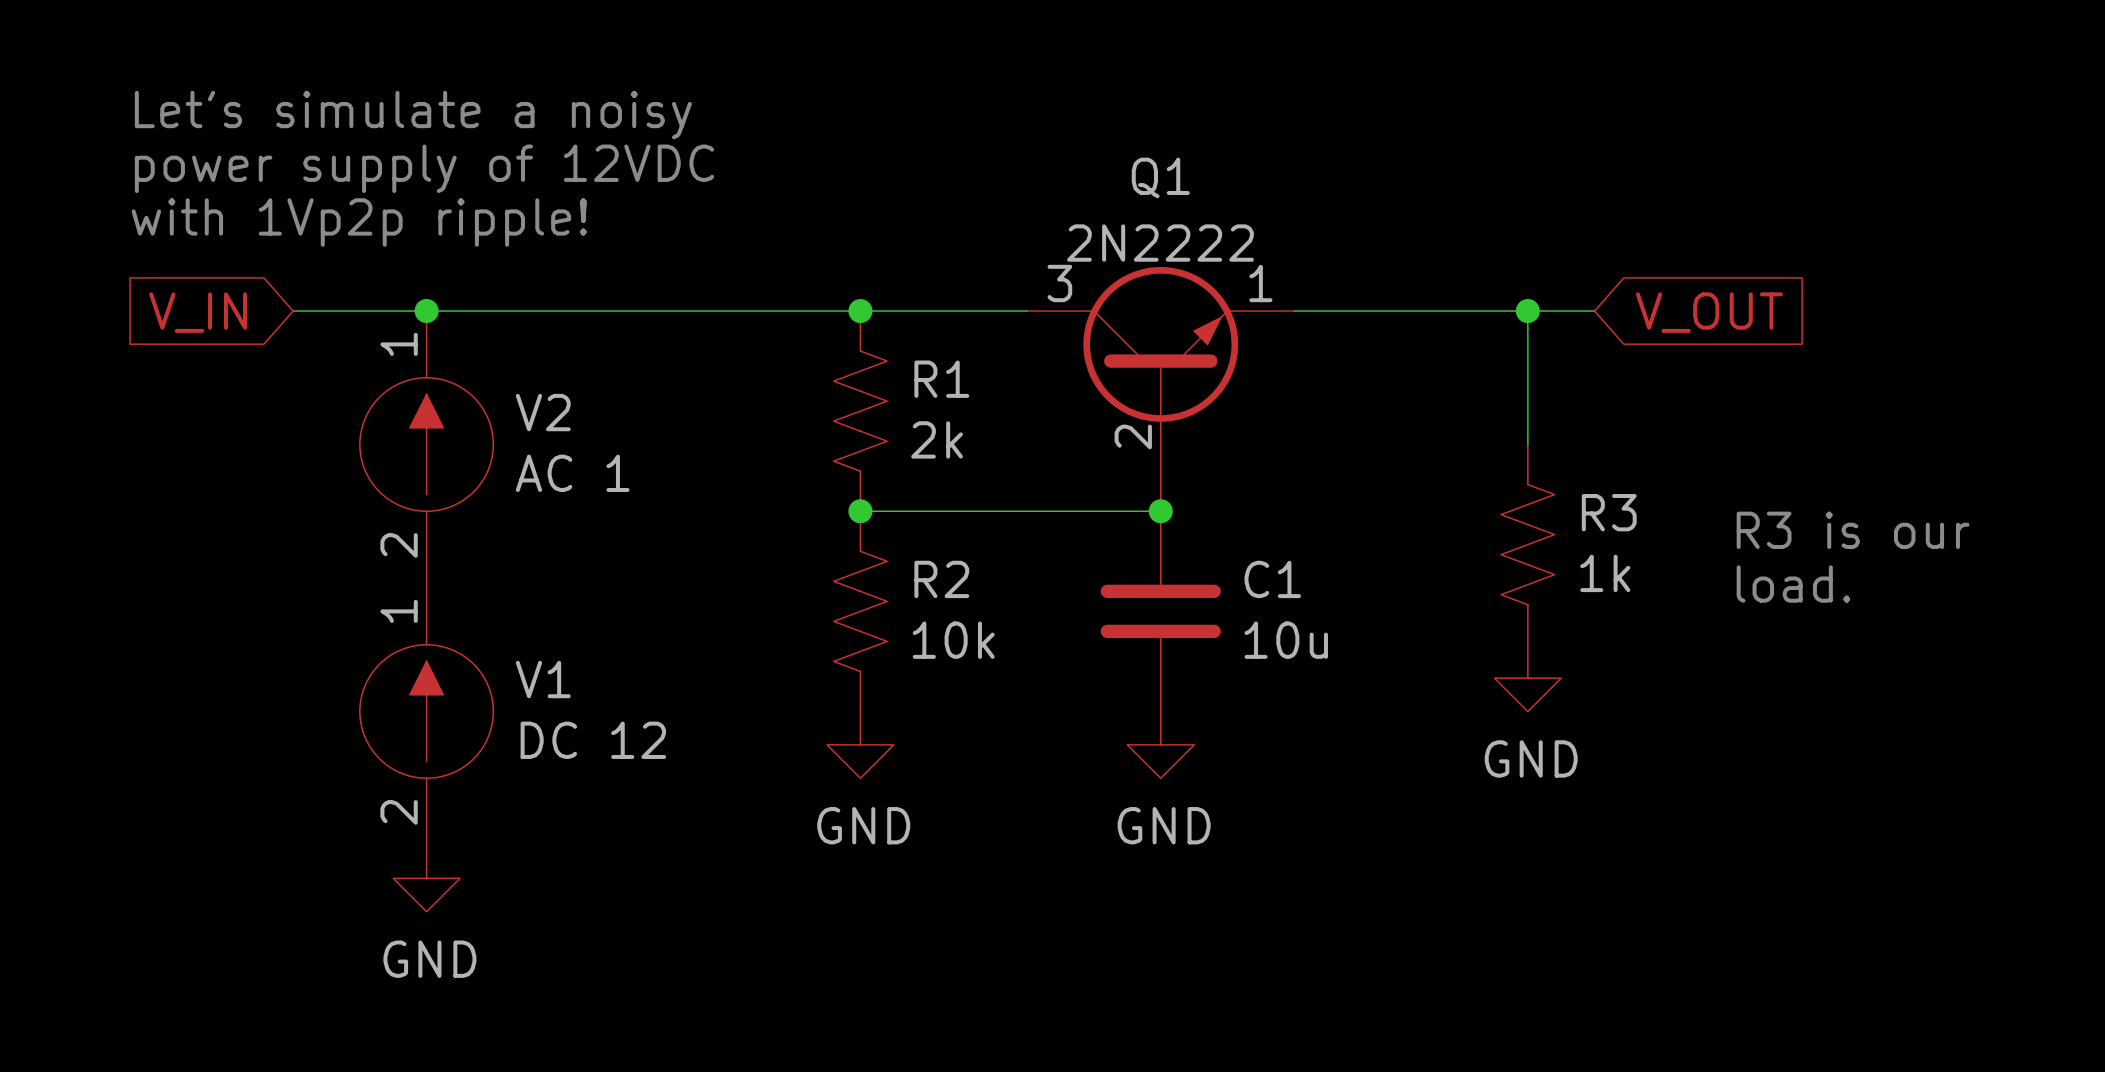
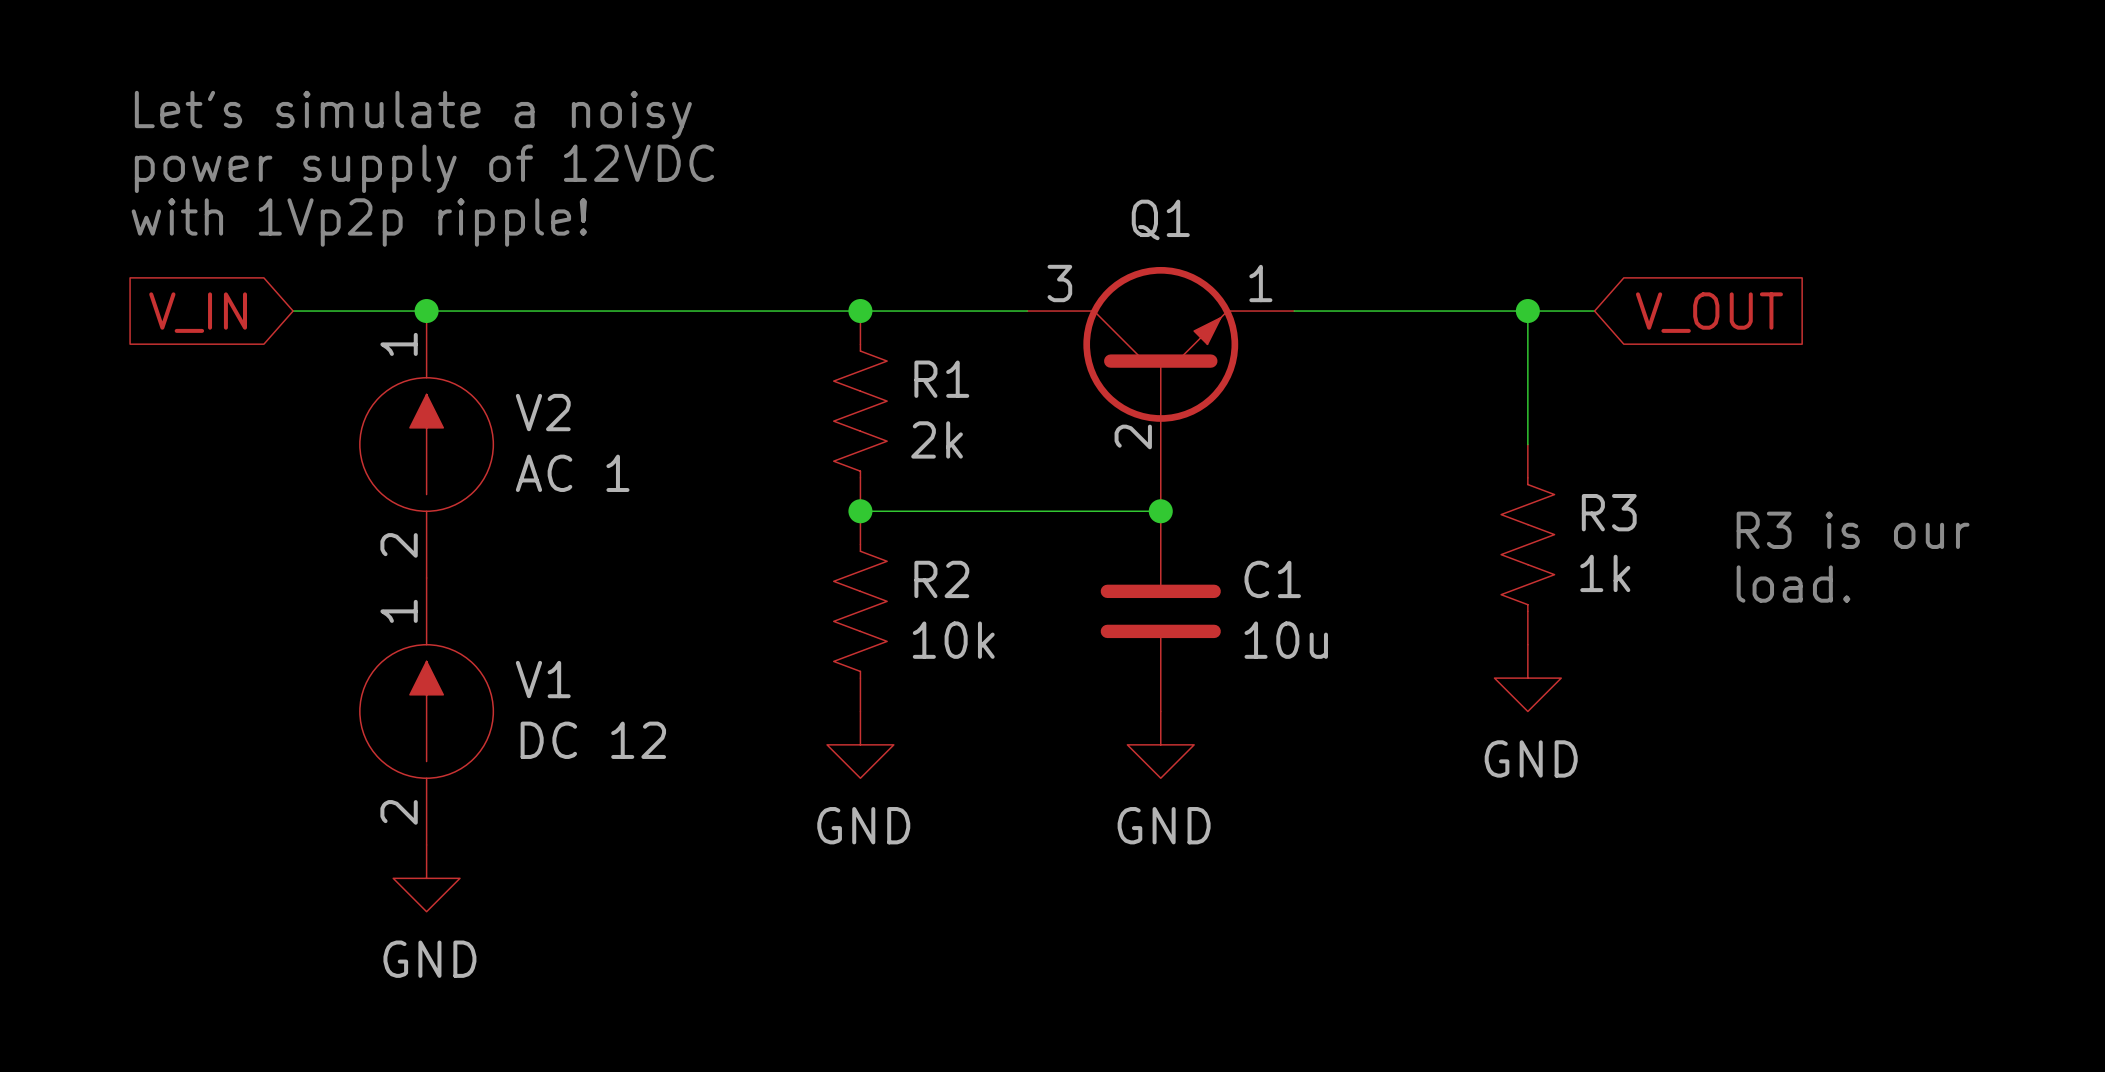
Q1 name position: Q1 (1160, 177) -> Q1 (1160, 219)
Q1 value: 2N2222 (1160, 243) -> none

